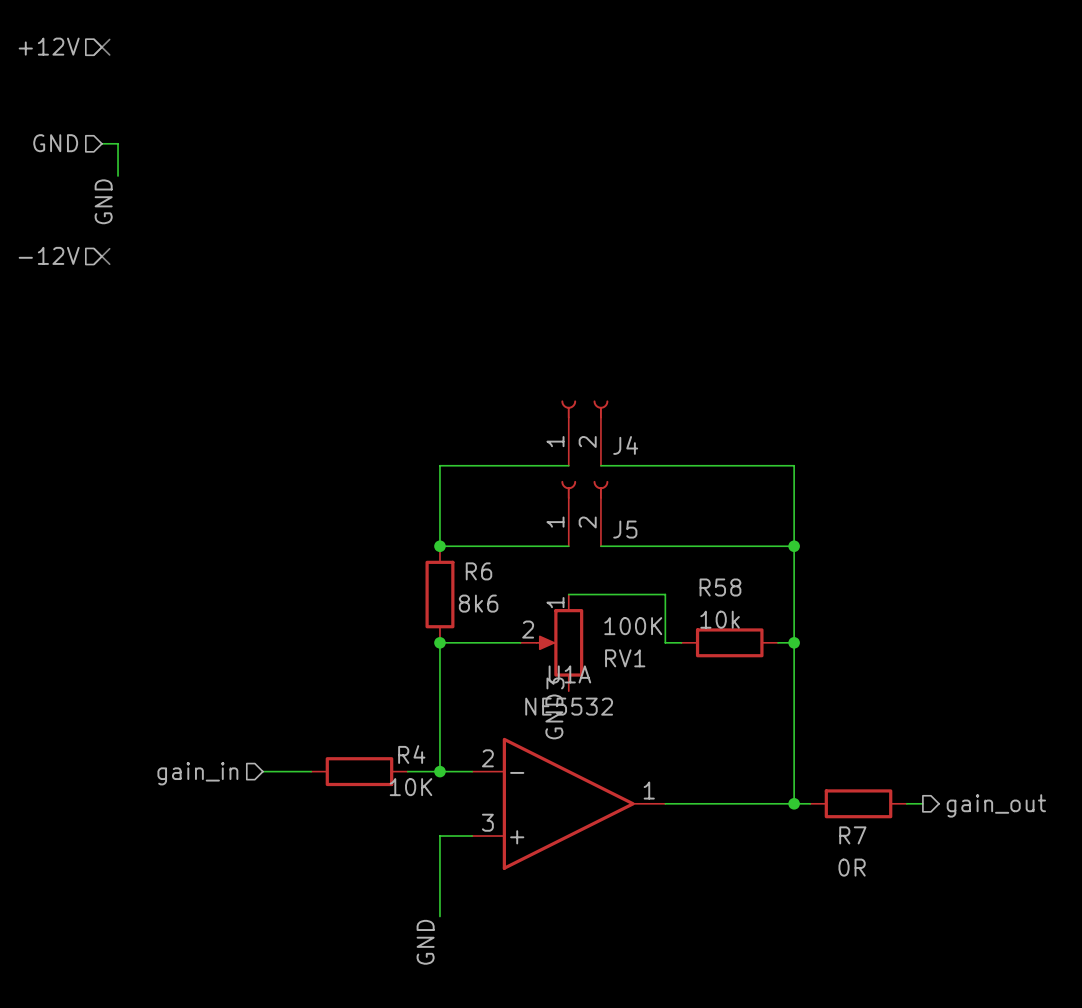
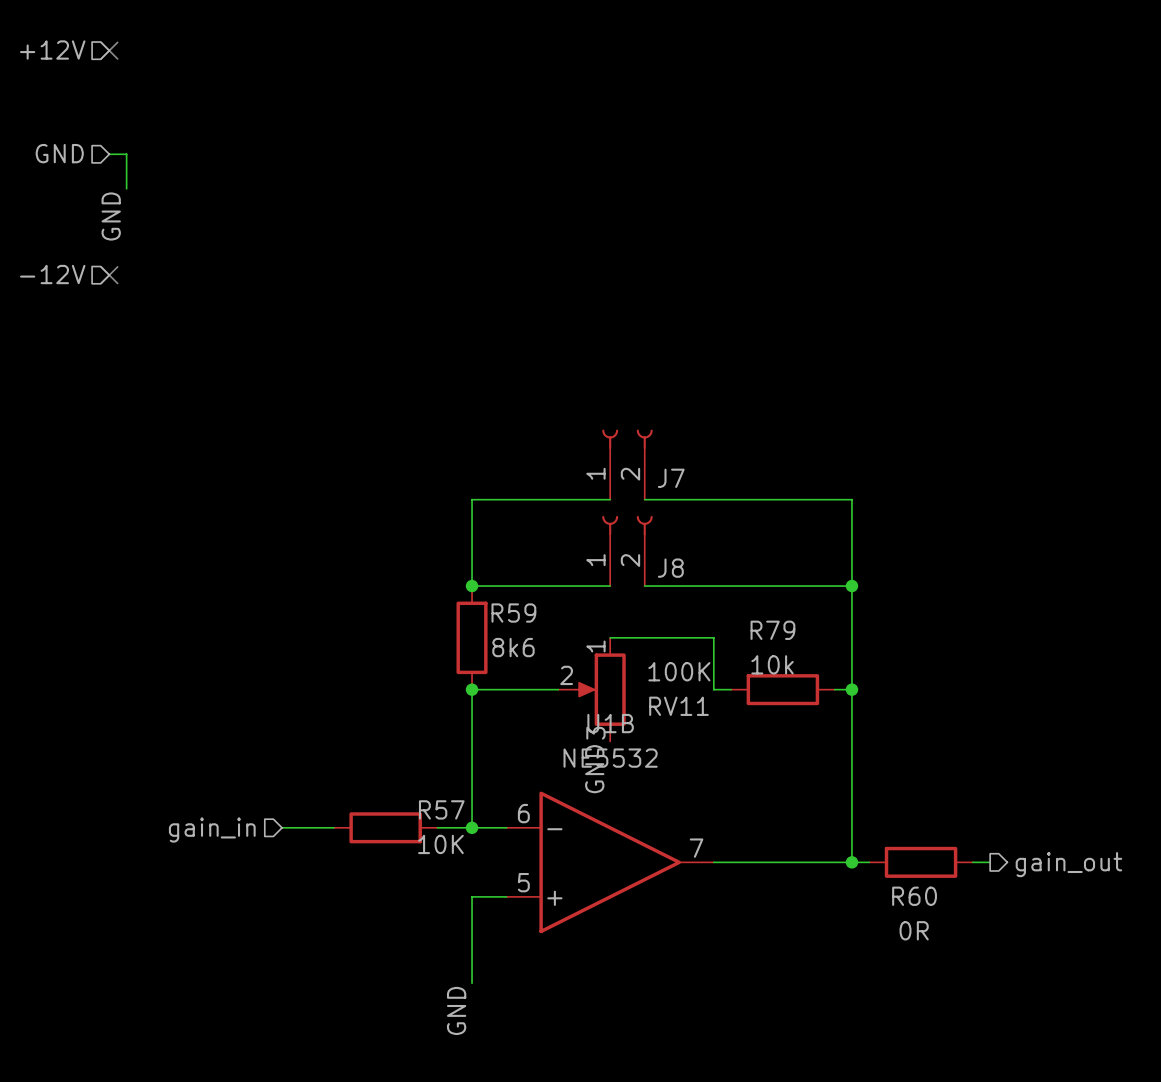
J4 name: J4 (625, 445) -> J7 (671, 478)
J5 name: J5 (625, 529) -> J8 (670, 568)
R6 name: R6 (478, 571) -> R59 (513, 613)
R58 name: R58 (720, 587) -> R79 (772, 630)
RV1 name: RV1 (625, 658) -> RV11 (678, 706)
U1A name: U1A (569, 674) -> U1B (610, 723)
R4 name: R4 (411, 754) -> R57 (441, 809)
U1A pin number: 2 (487, 758) -> 6 (523, 813)
U1A pin number: 1 (649, 790) -> 7 (696, 848)
U1A pin number: 3 (487, 822) -> 5 (523, 882)
R7 name: R7 (852, 835) -> R60 (914, 896)

